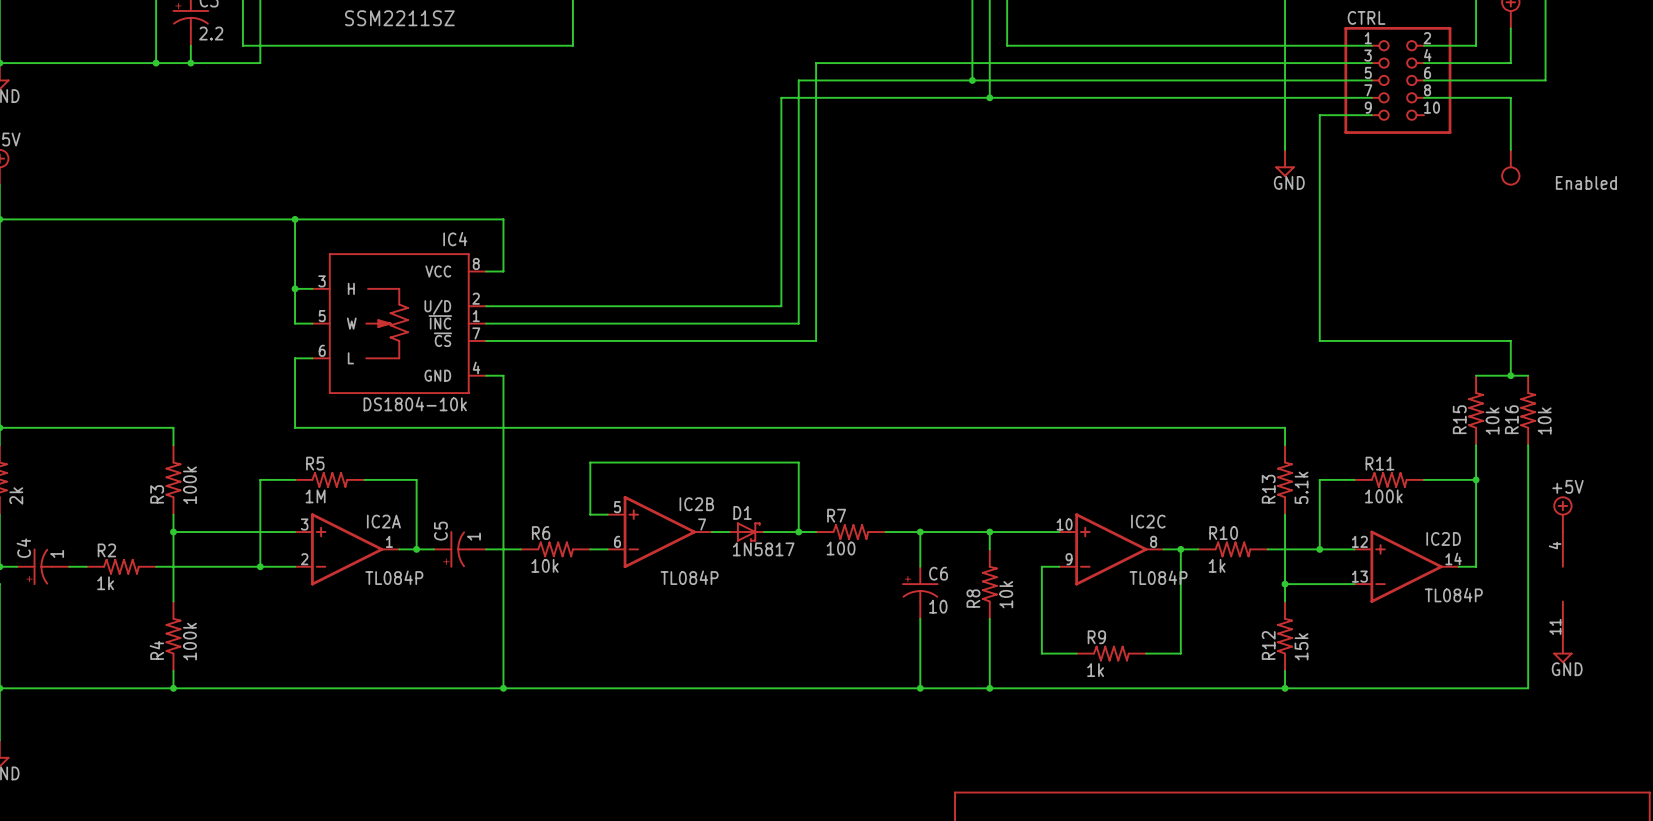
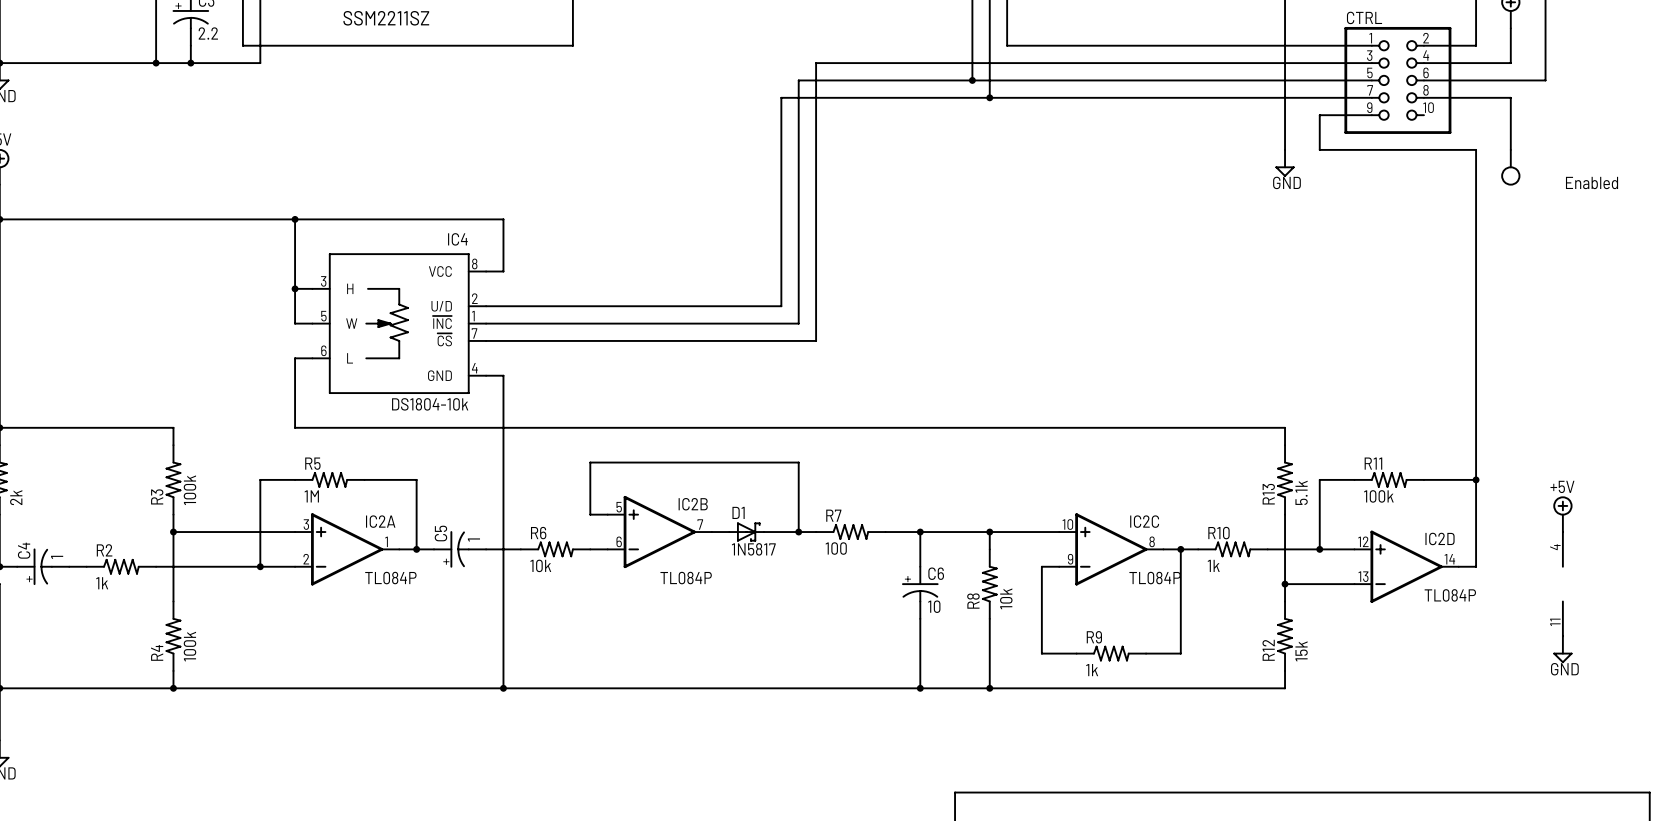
wire: (1319, 149) (1319, 340) (1510, 340) (1510, 375) -> (1319, 149) (1476, 149) (1476, 445)
wire: (1476, 375) (1528, 375) -> none
junction: (1510, 375) -> none
R15: 10k (1476, 410) -> none
R16: 10k (1528, 410) -> none
wire: (1528, 445) (1528, 688) (1285, 688) -> none
junction: (1285, 688) -> none

